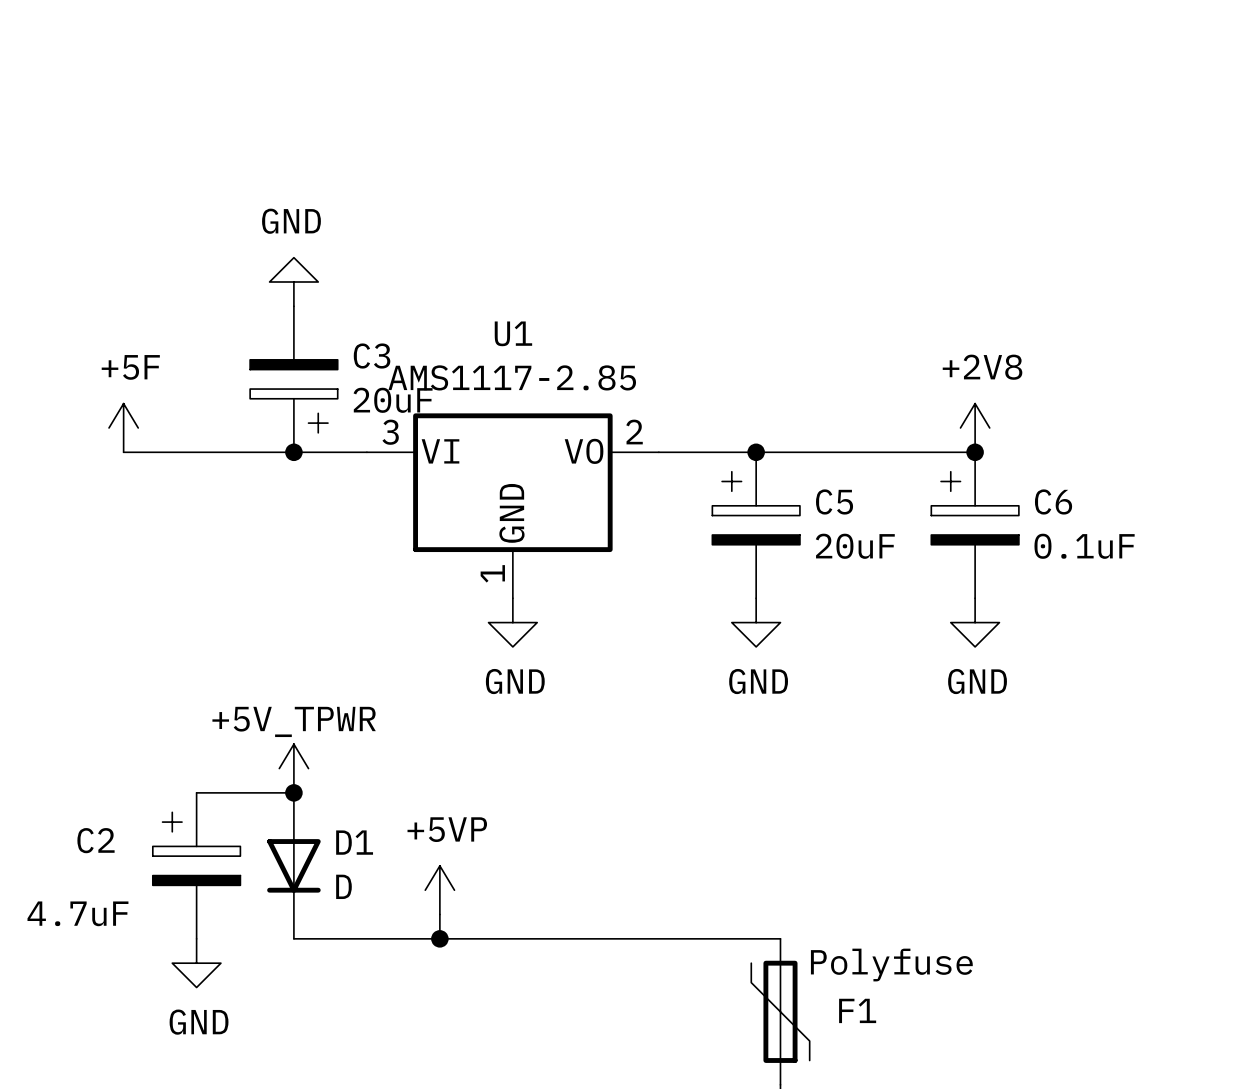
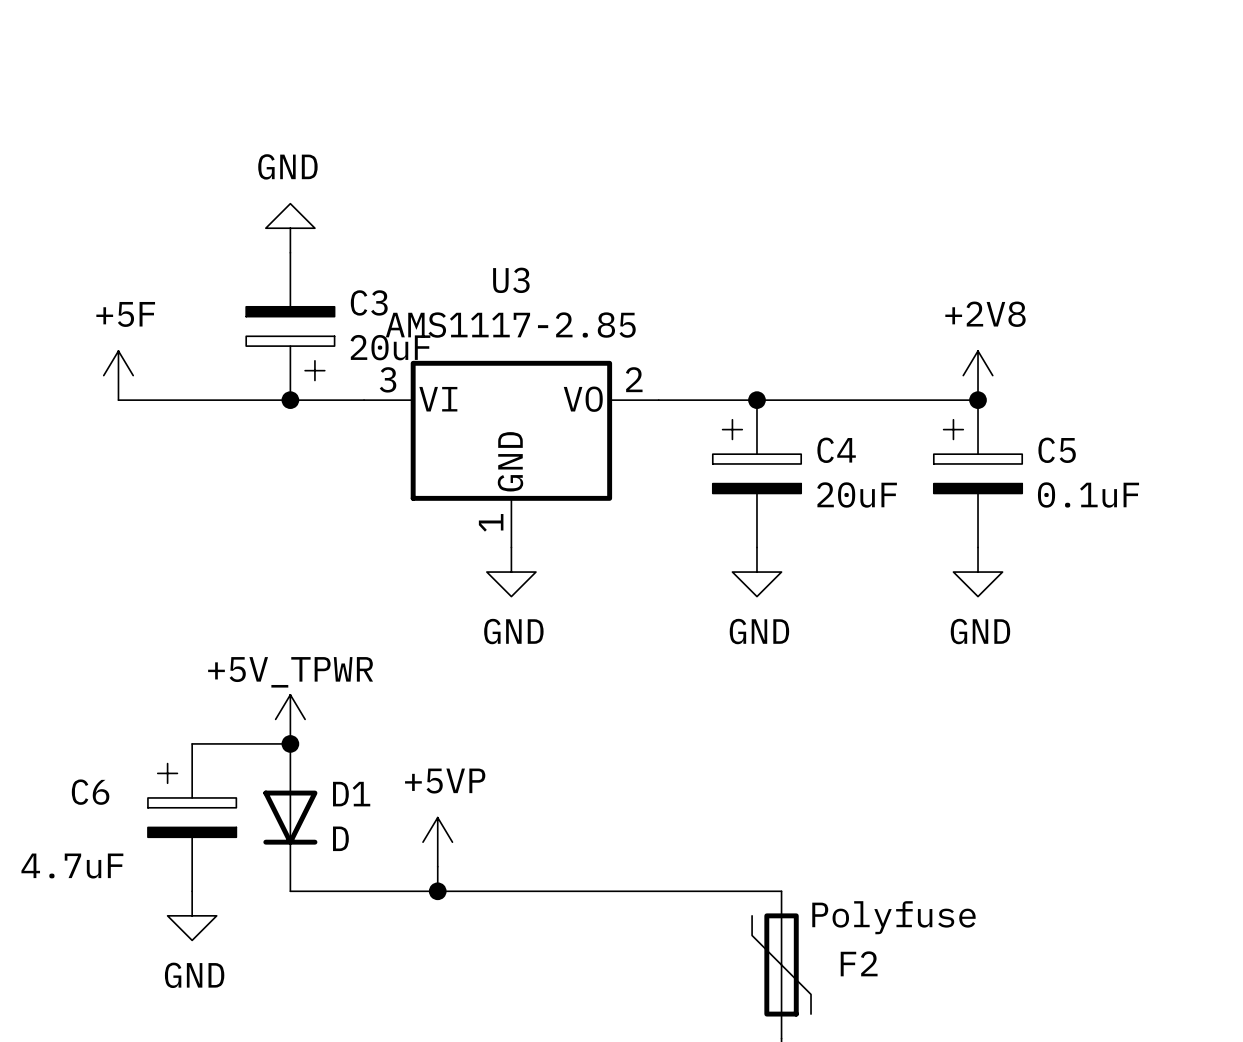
U1 name: U1 (513, 333) -> U3 (511, 280)
C5 name: C5 (834, 501) -> C4 (836, 450)
C6 name: C6 (1053, 501) -> C5 (1057, 450)
C2 name: C2 (96, 840) -> C6 (90, 792)
F1 name: F1 (857, 1010) -> F2 (859, 963)

